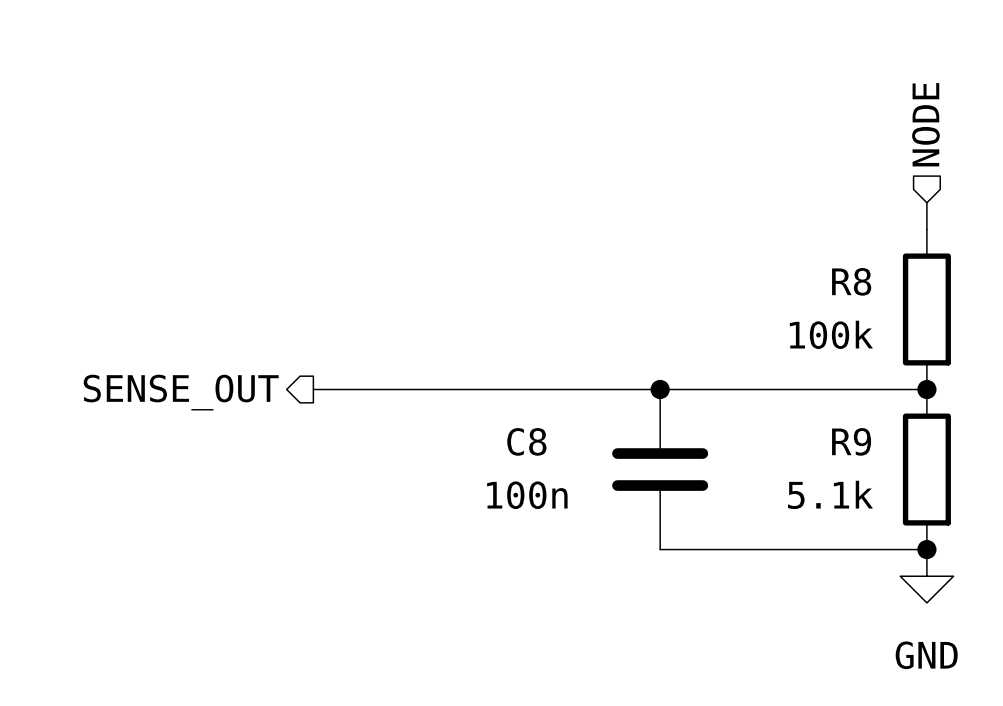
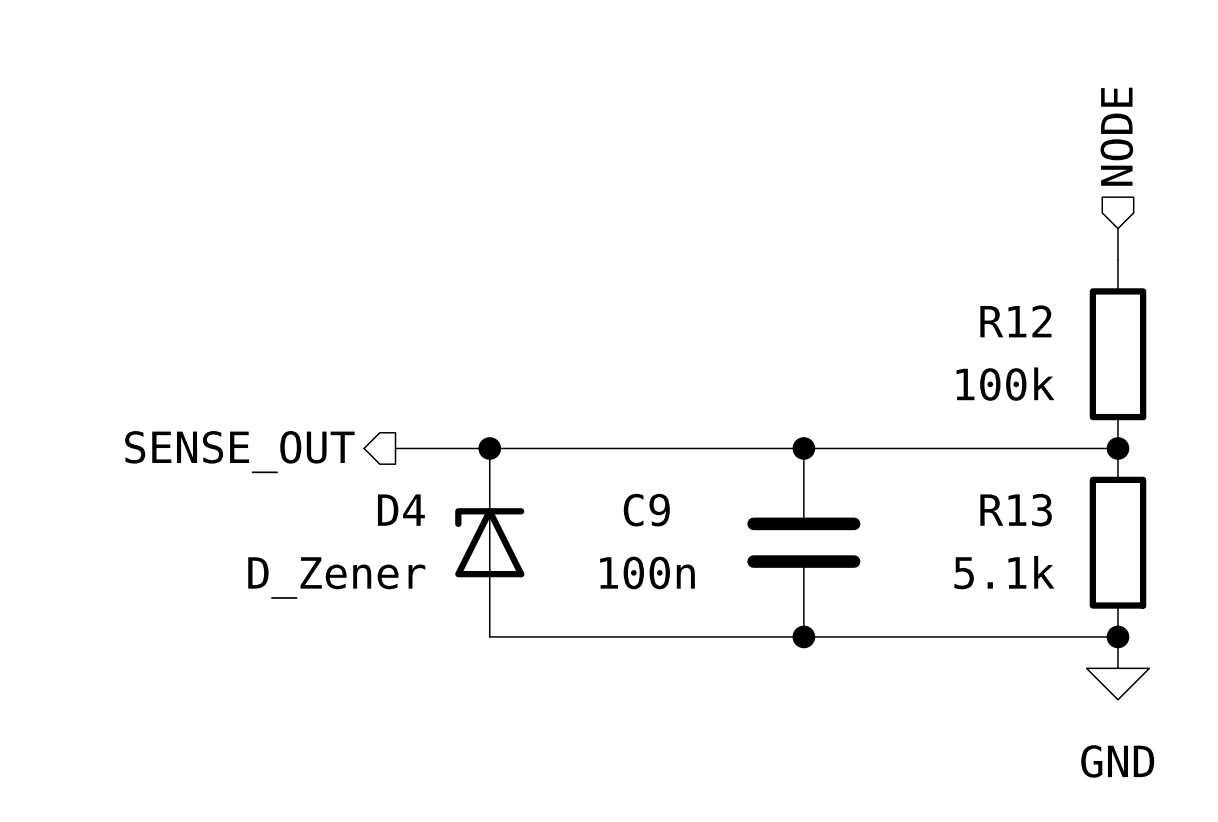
R8 name: R8 (851, 281) -> R12 (1015, 321)
junction: none -> (489, 448)
C8 name: C8 (526, 441) -> C9 (646, 510)
R9 name: R9 (851, 441) -> R13 (1016, 510)
D4: none -> D_Zener (489, 542)
wire: none -> (489, 636) (803, 636)
junction: none -> (803, 636)

